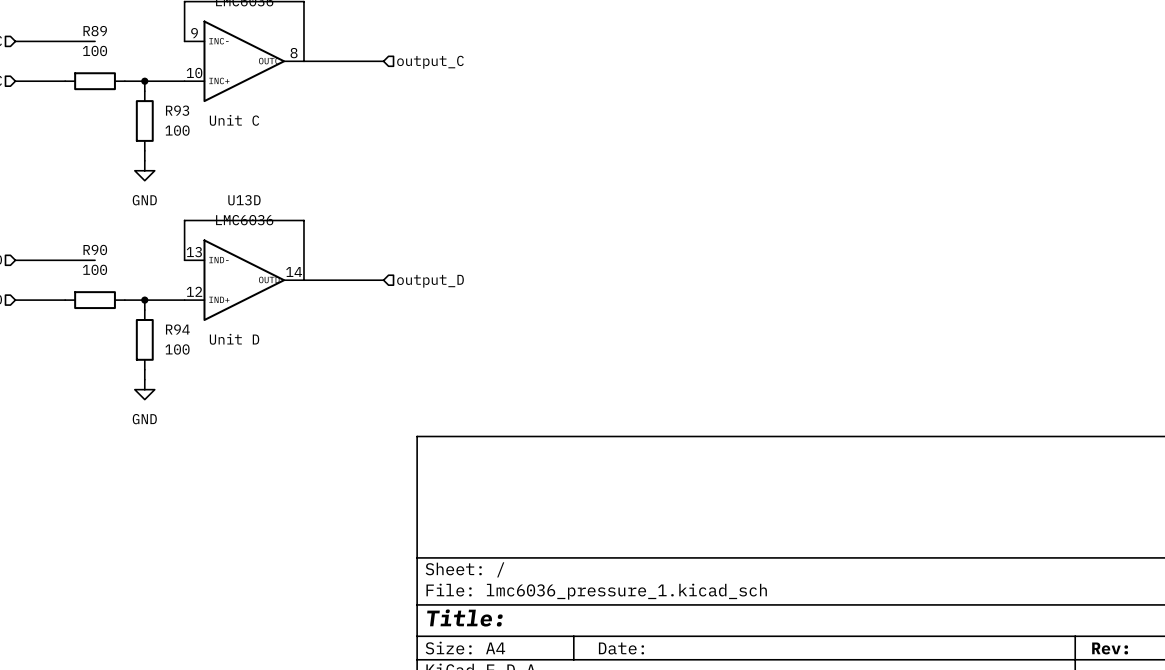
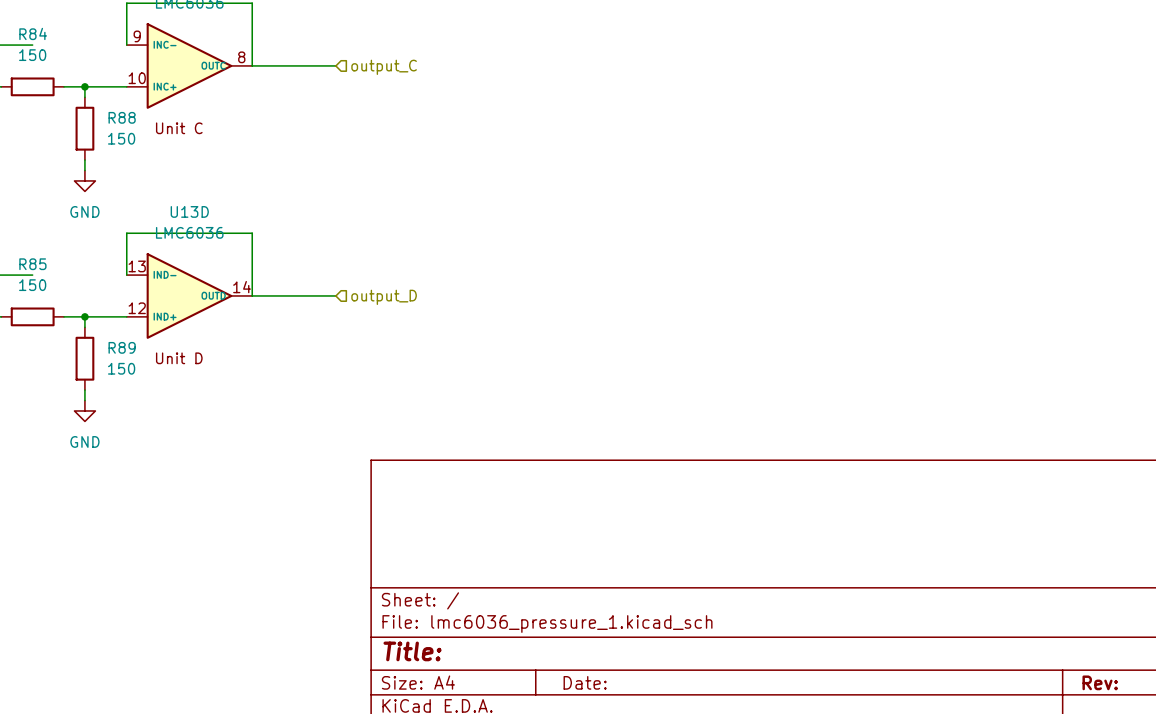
R89 name: R89 (95, 31) -> R84 (33, 33)
R89 value: 100 (95, 50) -> 150 (32, 55)
R93 name: R93 (177, 110) -> R88 (122, 117)
R93 value: 100 (177, 130) -> 150 (121, 138)
R90 name: R90 (95, 249) -> R85 (32, 264)
R90 value: 100 (95, 269) -> 150 (32, 285)
R94 name: R94 (177, 329) -> R89 (122, 347)
R94 value: 100 (177, 349) -> 150 (121, 368)

